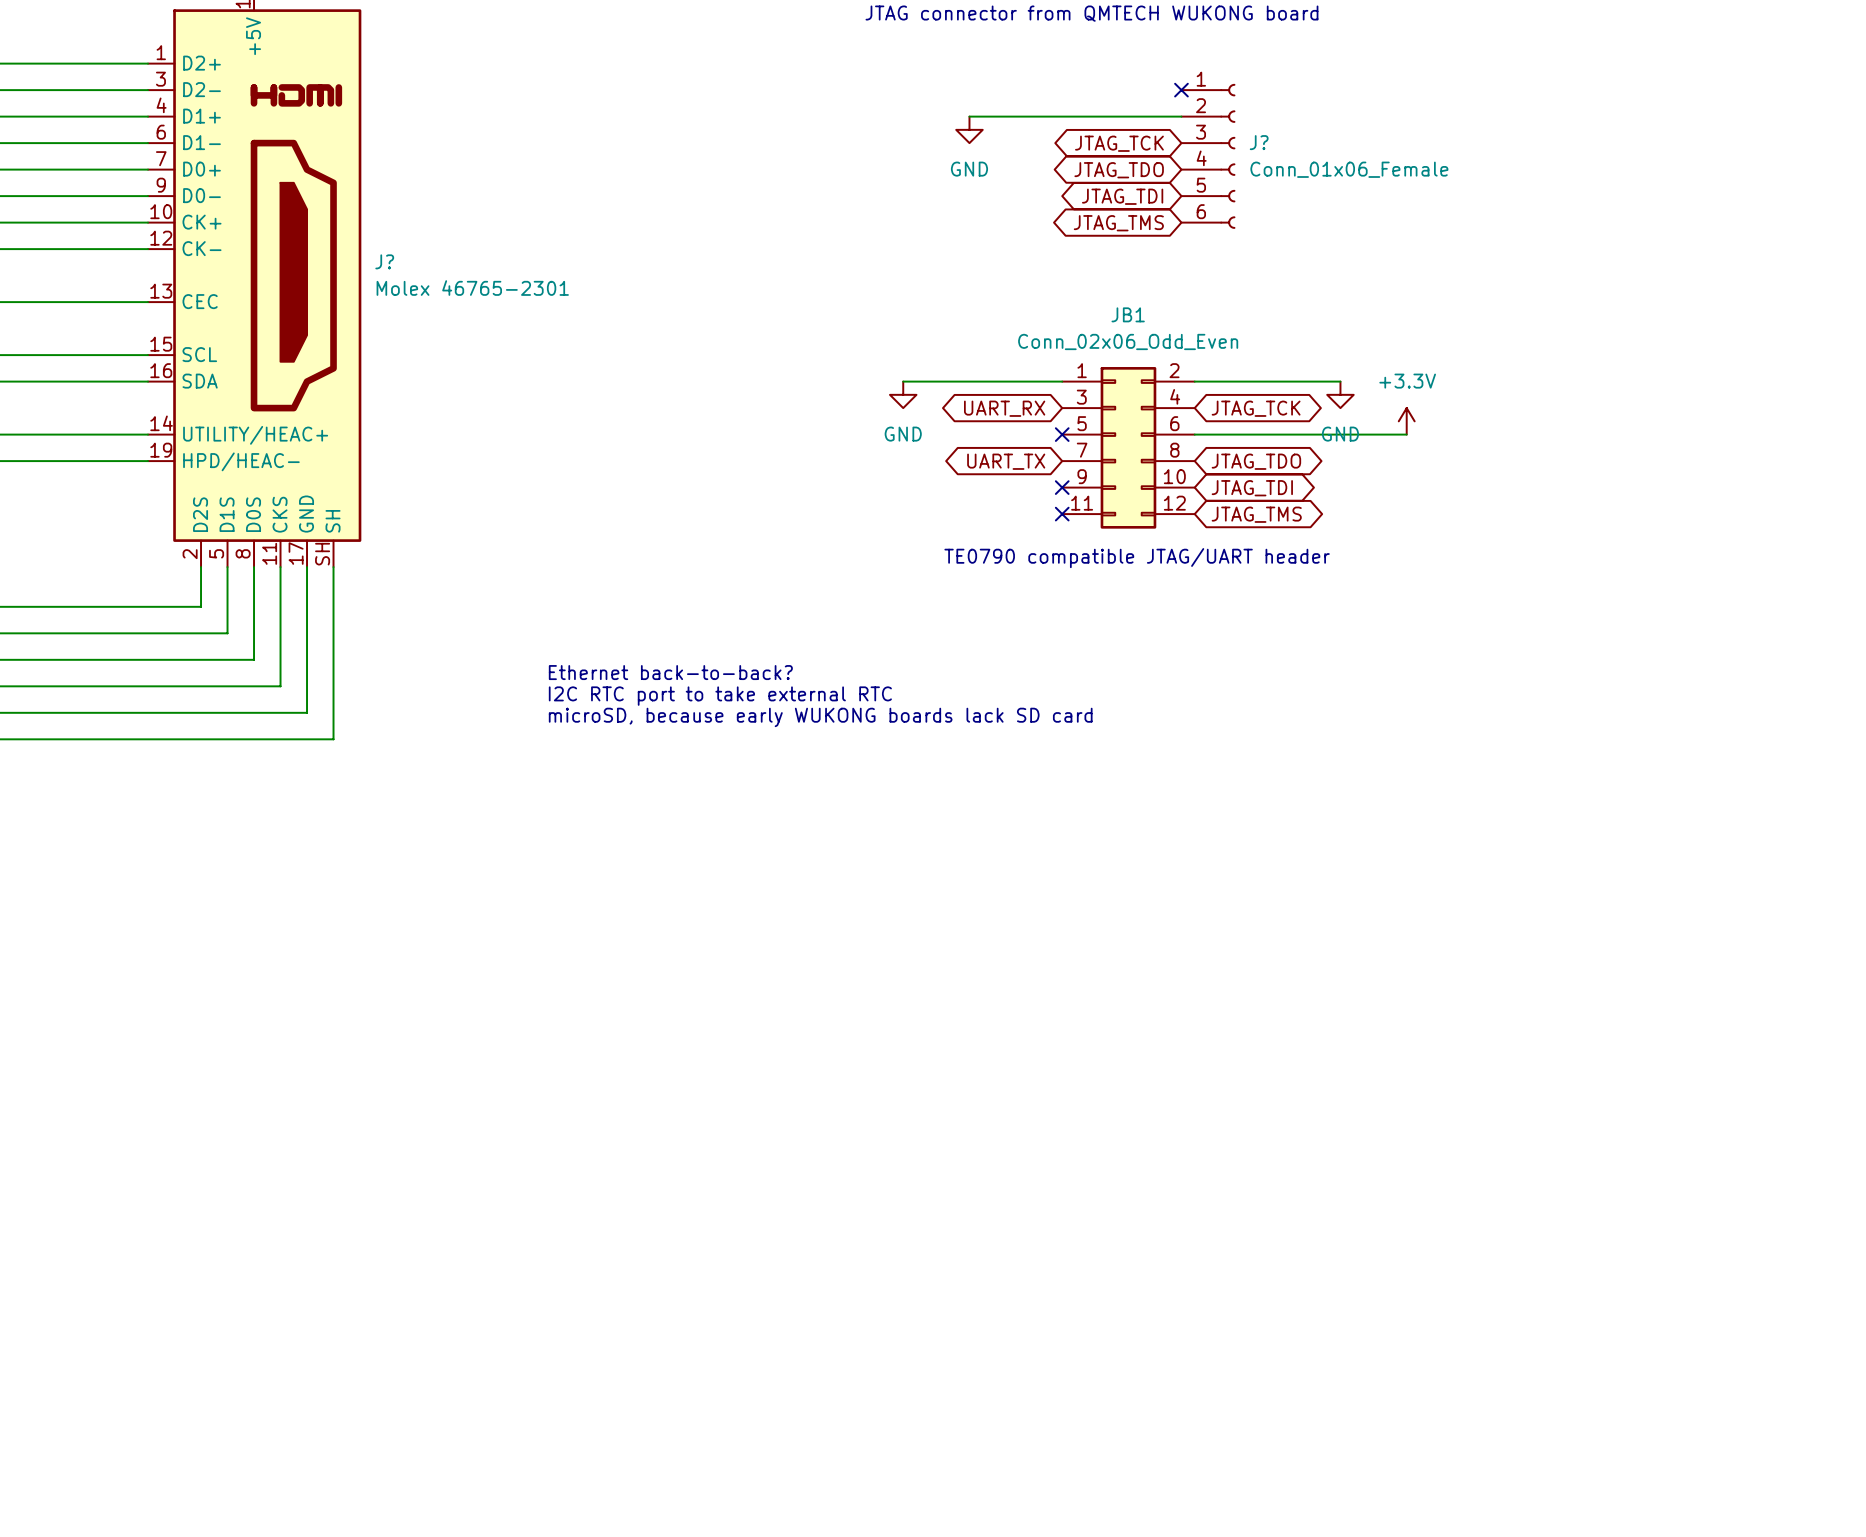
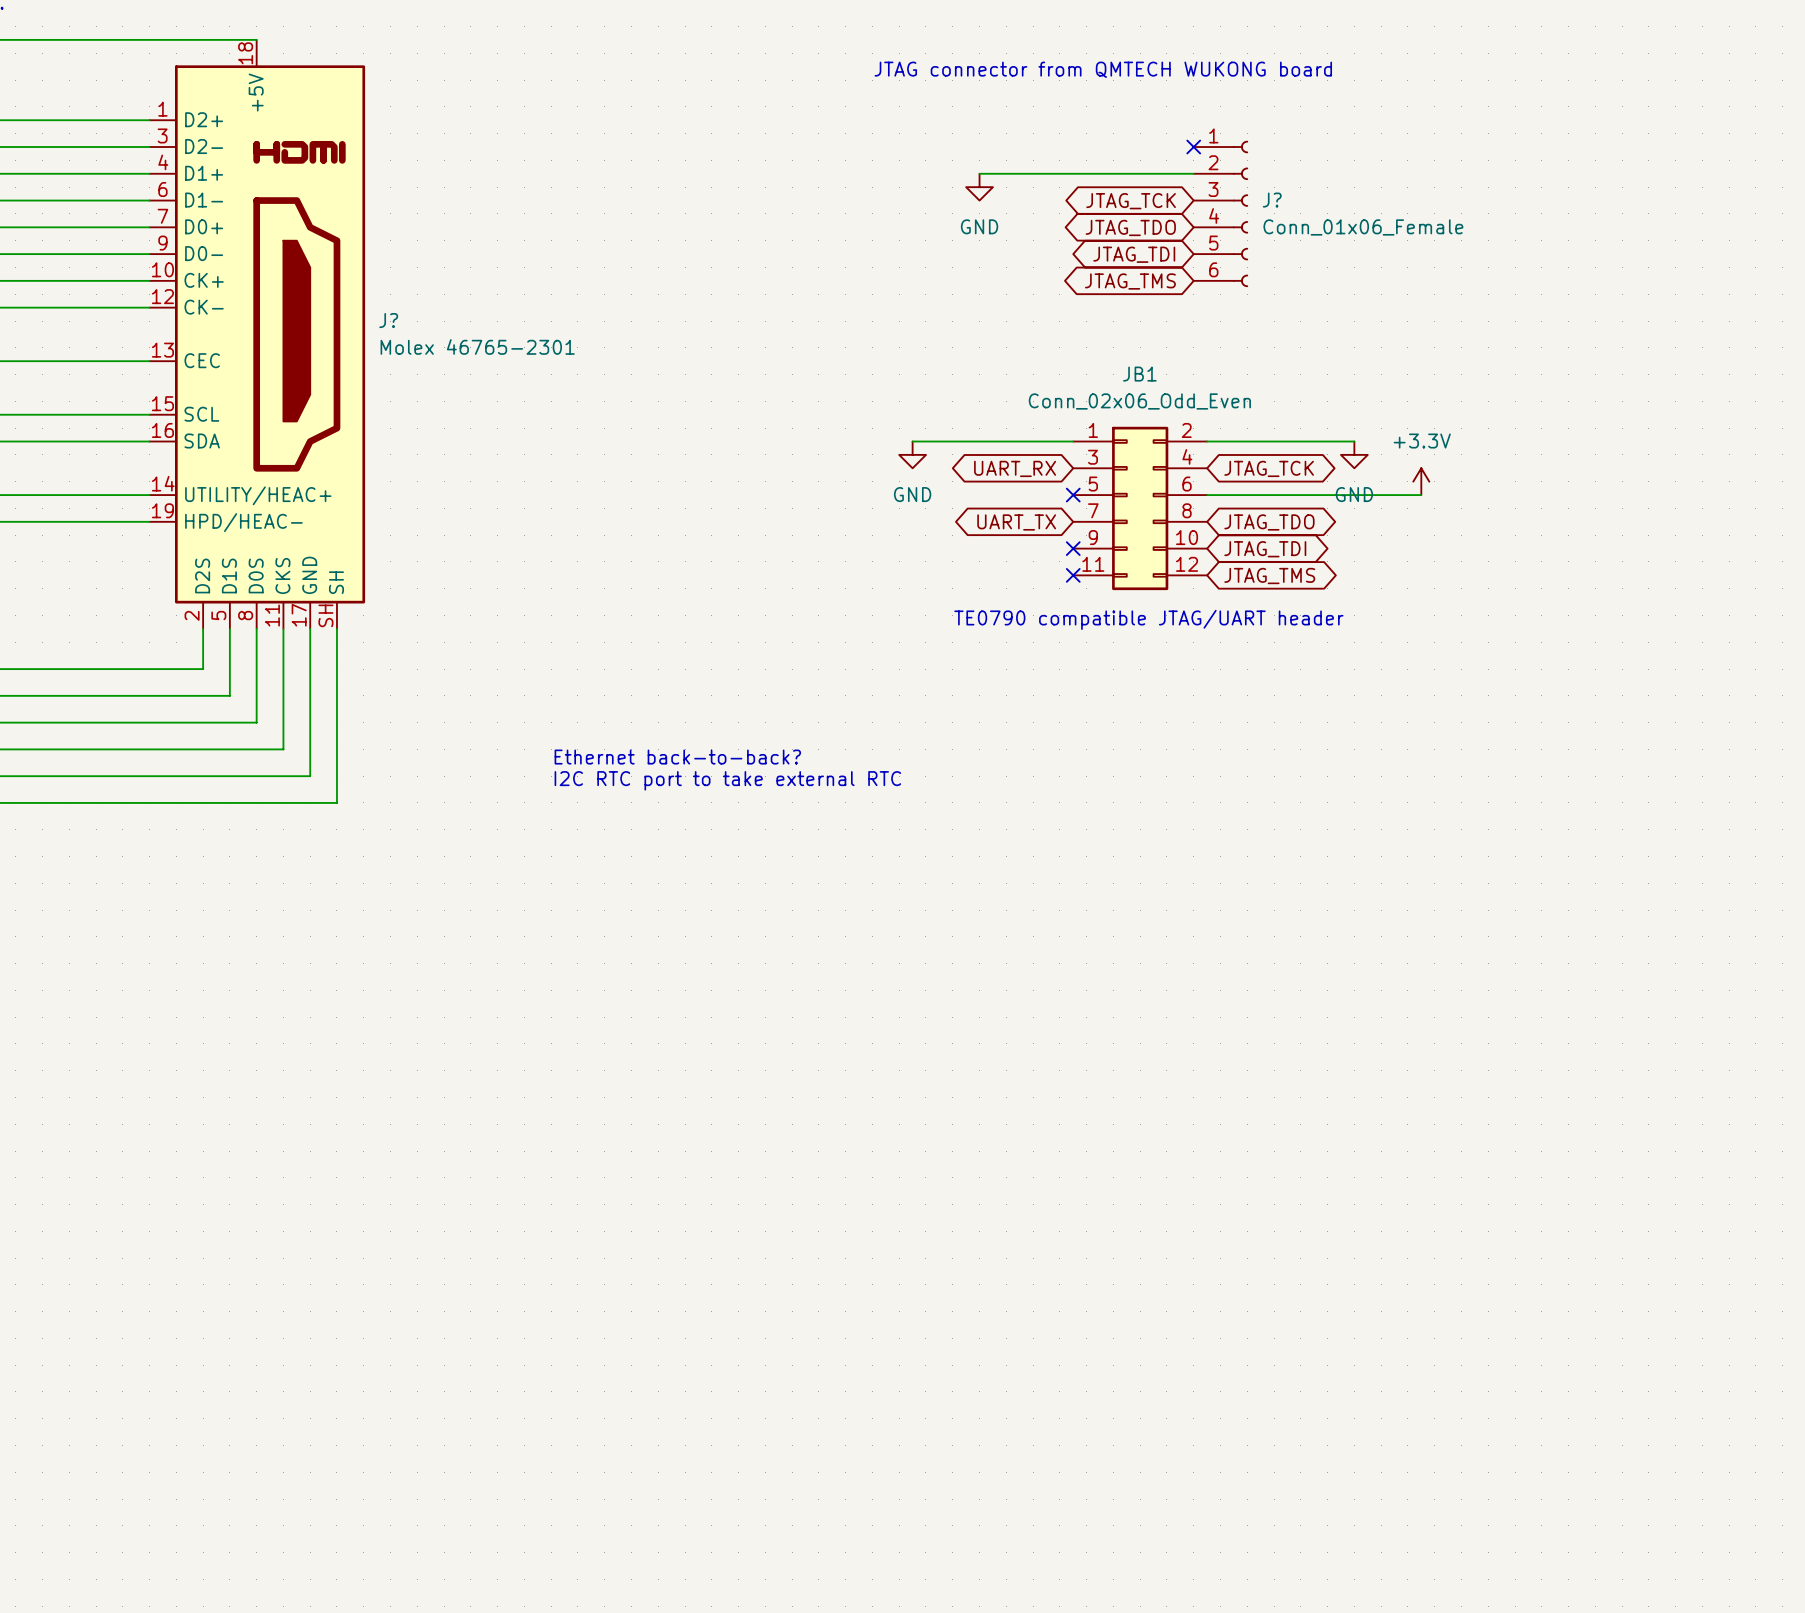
text: Ethernet back-to-back? (670, 672) -> none
text: I2C RTC port to take external RTC (720, 696) -> Ethernet back-to-back? (677, 757)
text: microSD, because early WUKONG boards lack SD card (820, 717) -> I2C RTC port to take external RTC (727, 780)

